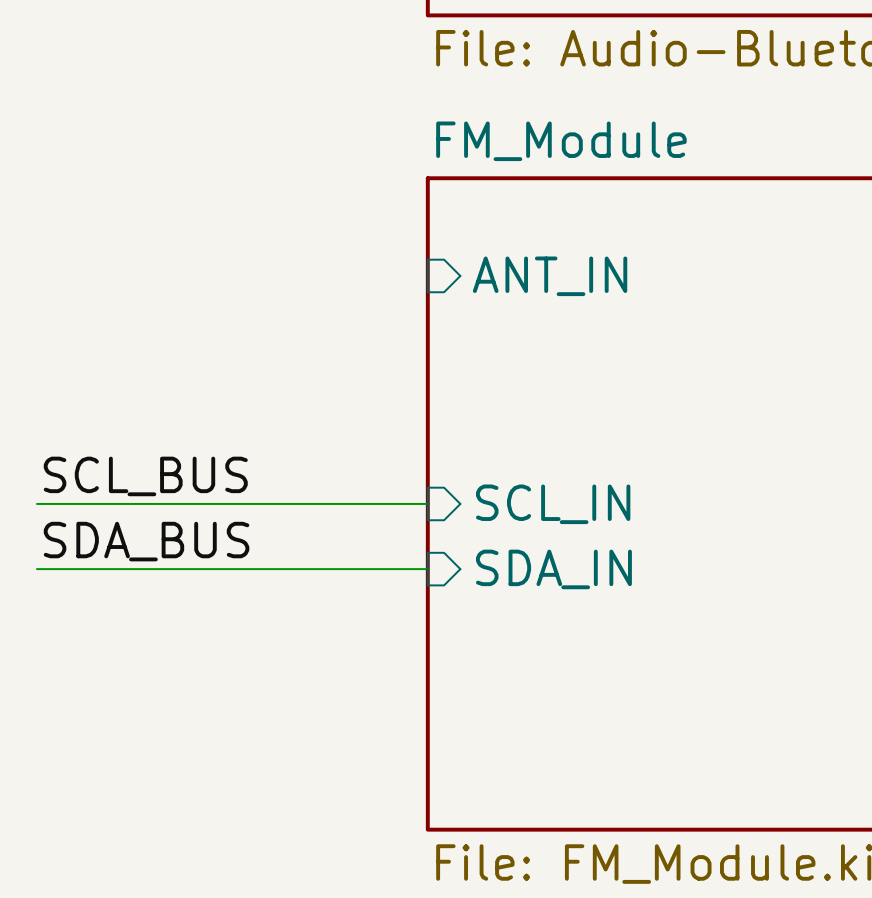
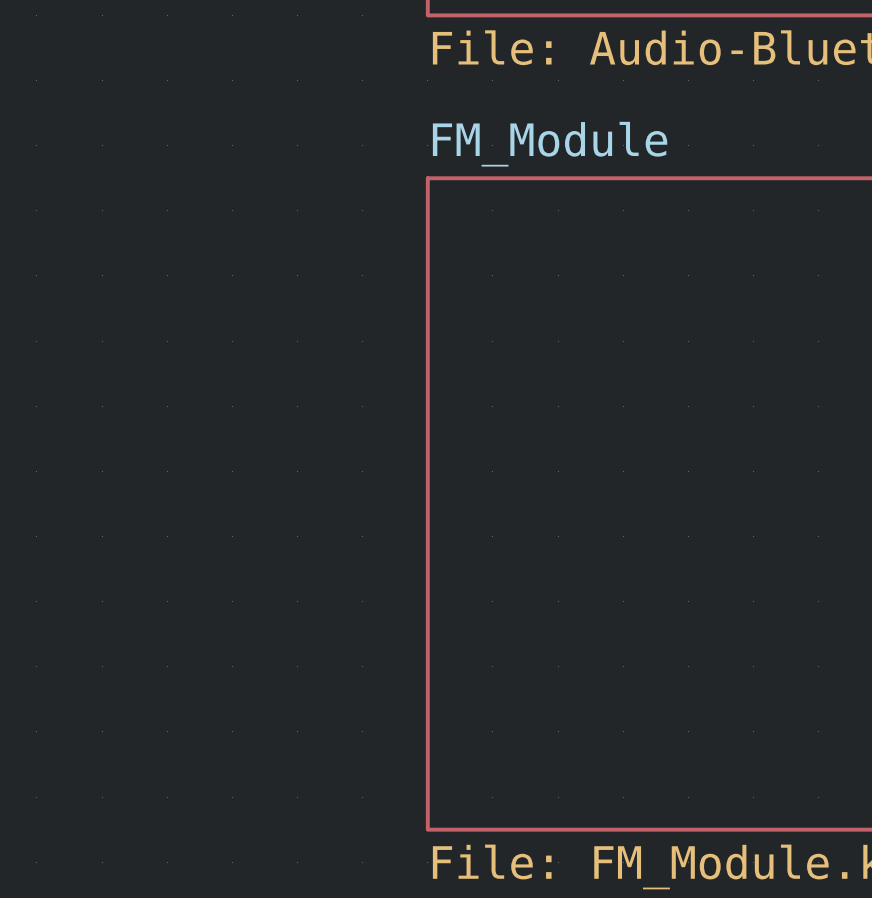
sheet pin: ANT_IN (550, 276) -> none
label: SCL_BUS (145, 476) -> none
wire: (36, 503) (427, 503) -> none
sheet pin: SCL_IN (553, 504) -> none
label: SDA_BUS (146, 541) -> none
wire: (36, 569) (427, 569) -> none
sheet pin: SDA_IN (553, 569) -> none

